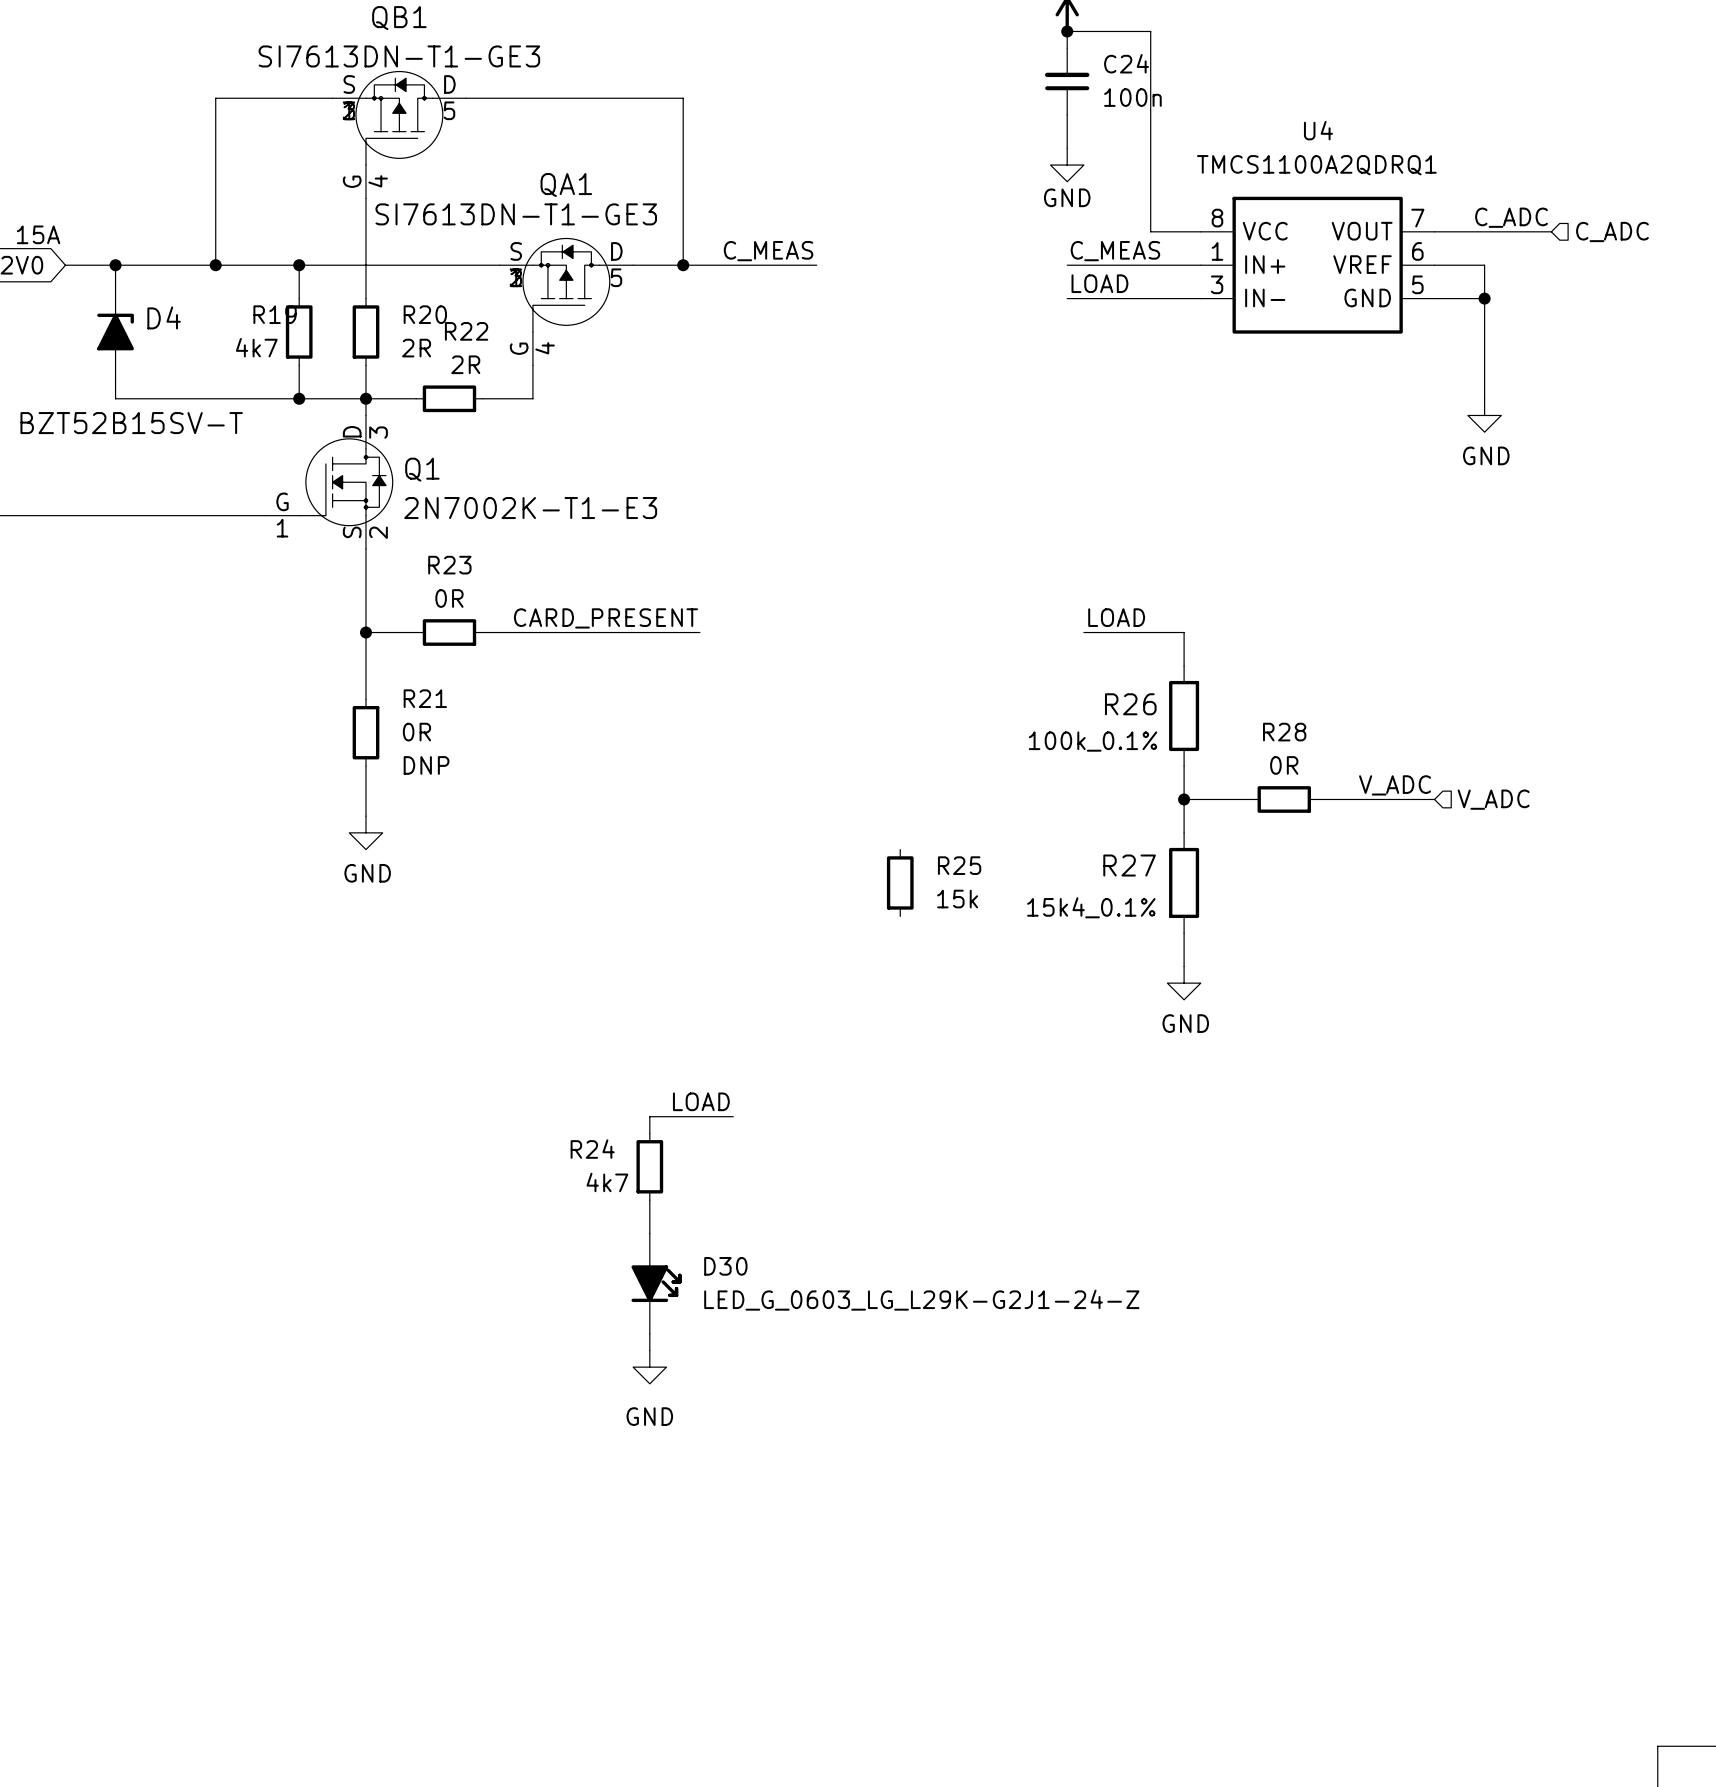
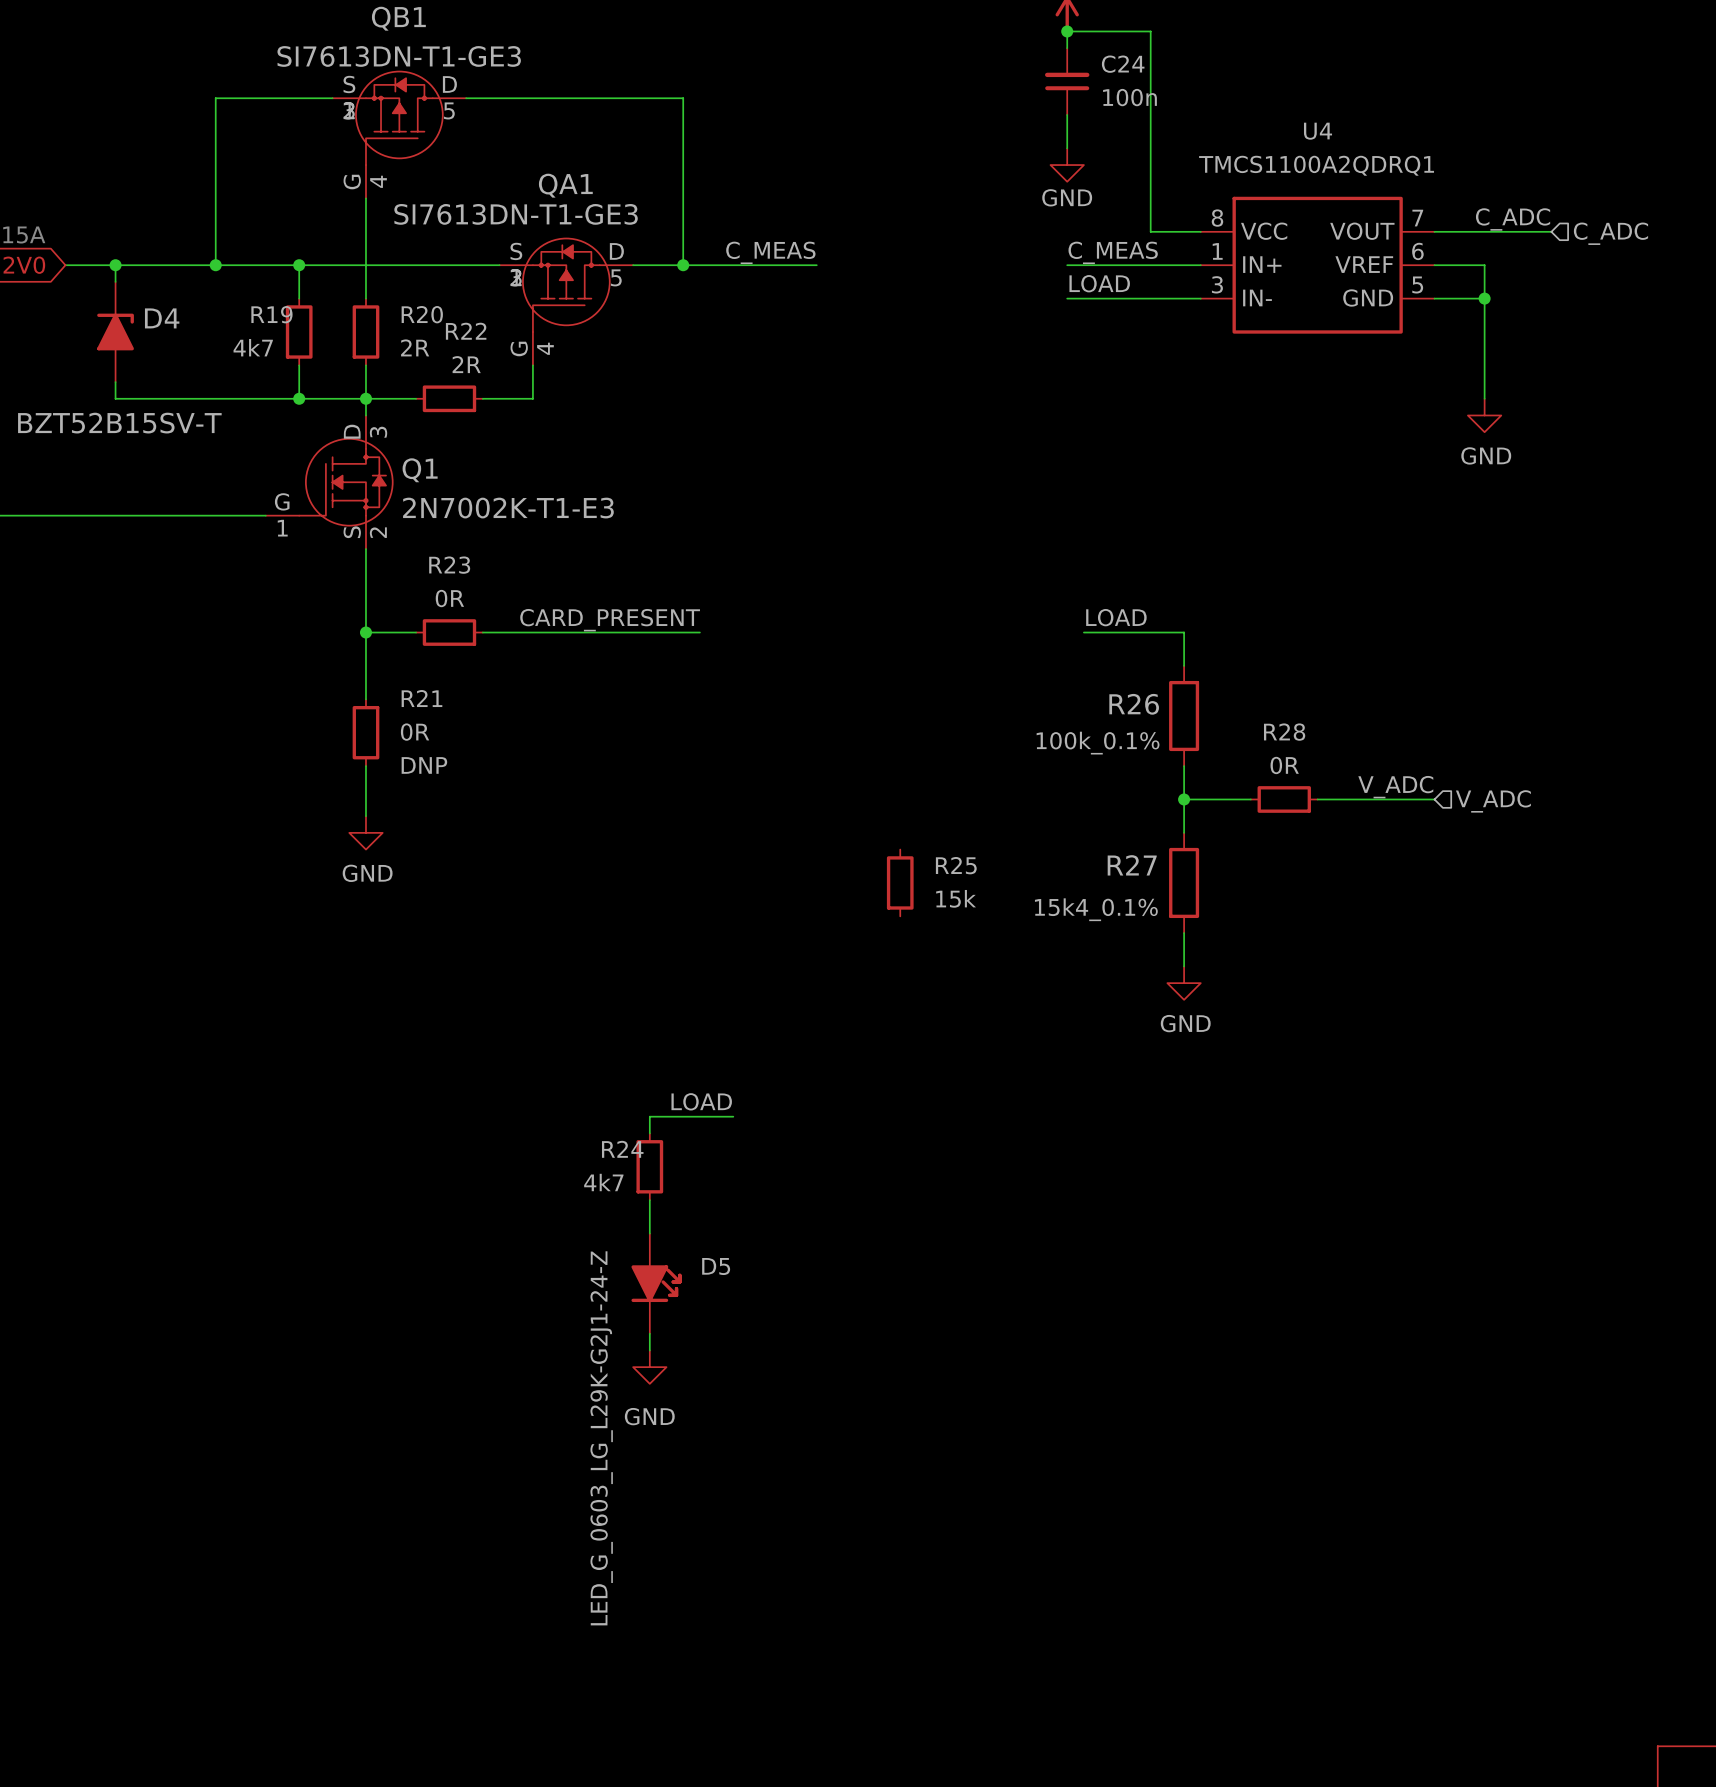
R24 name position: R24 (592, 1149) -> R24 (622, 1149)
D30 name: D30 (725, 1266) -> D5 (716, 1266)
D30 value rotation: 0° (921, 1300) -> 90° counterclockwise (601, 1438)

